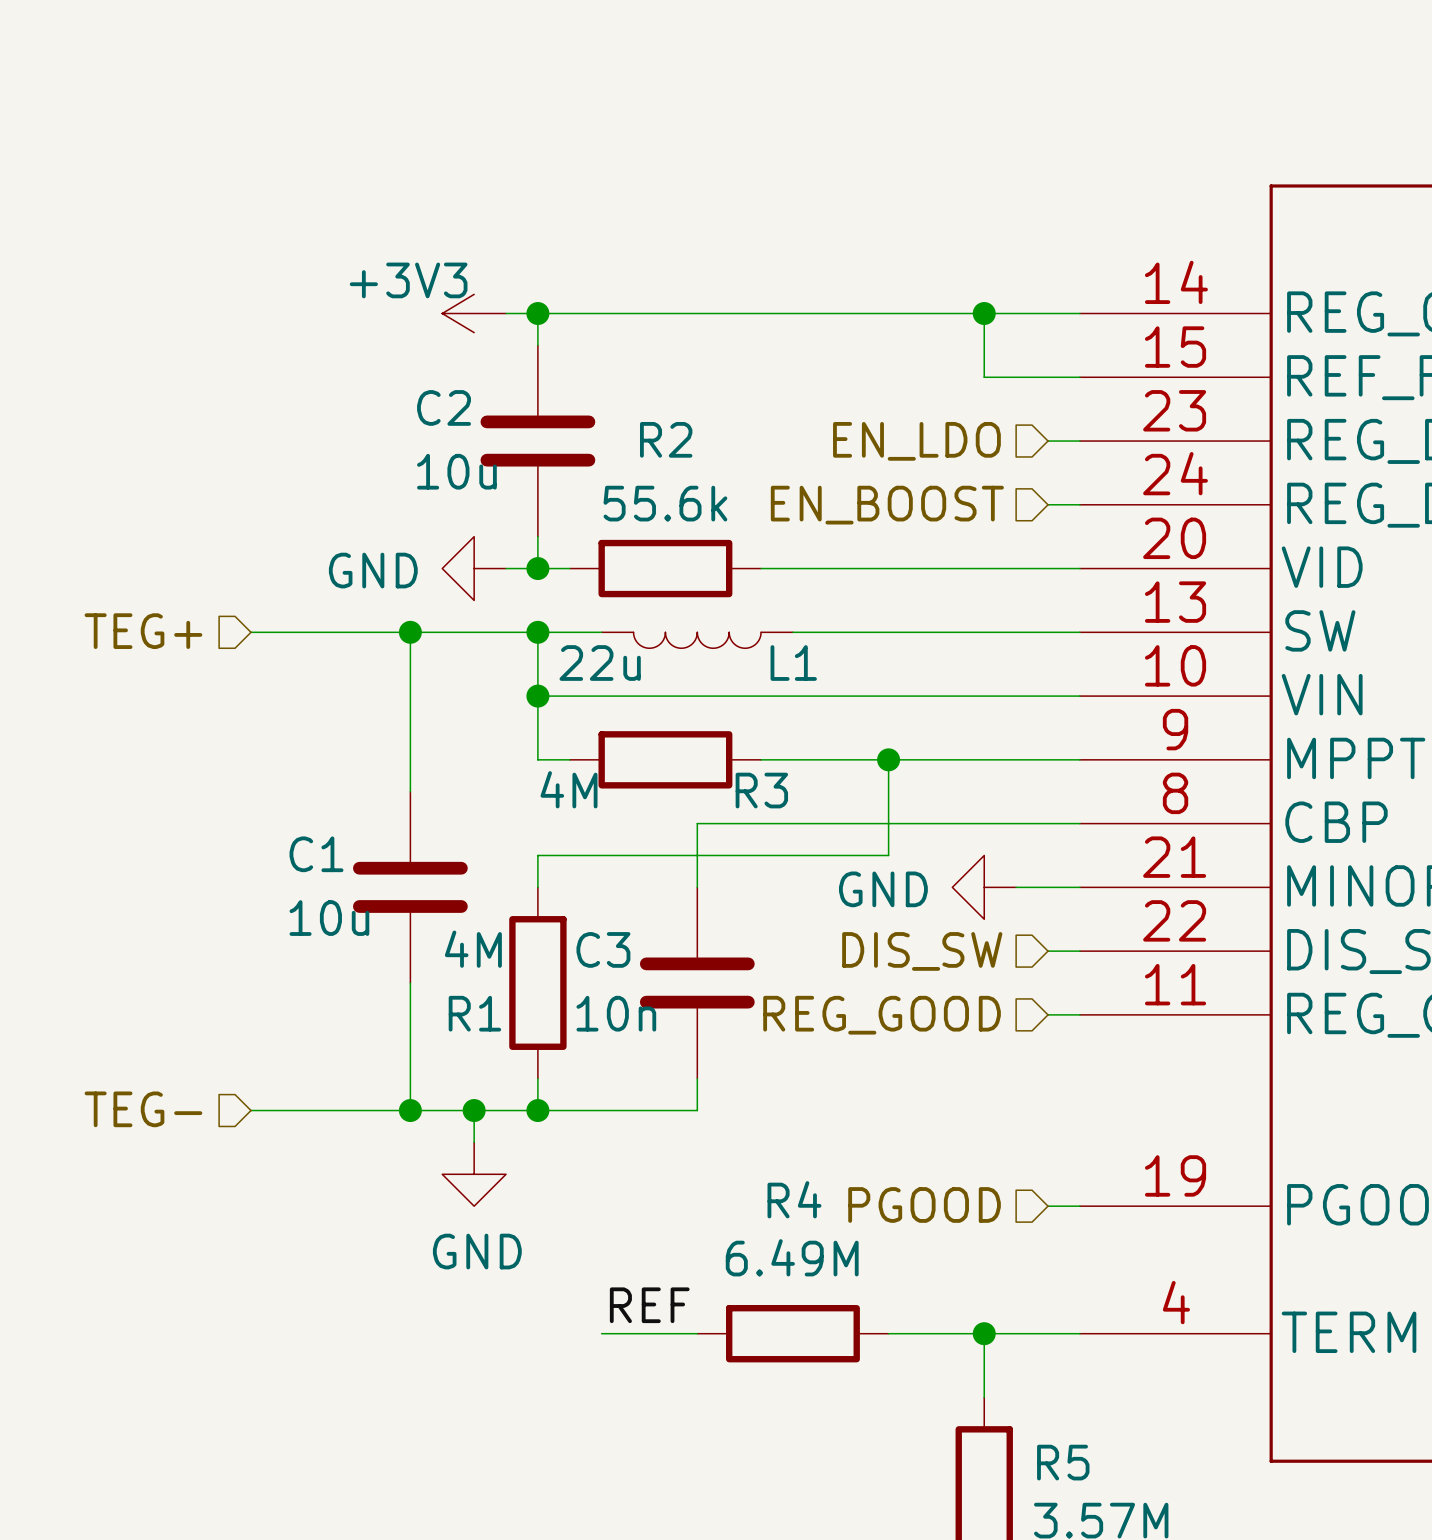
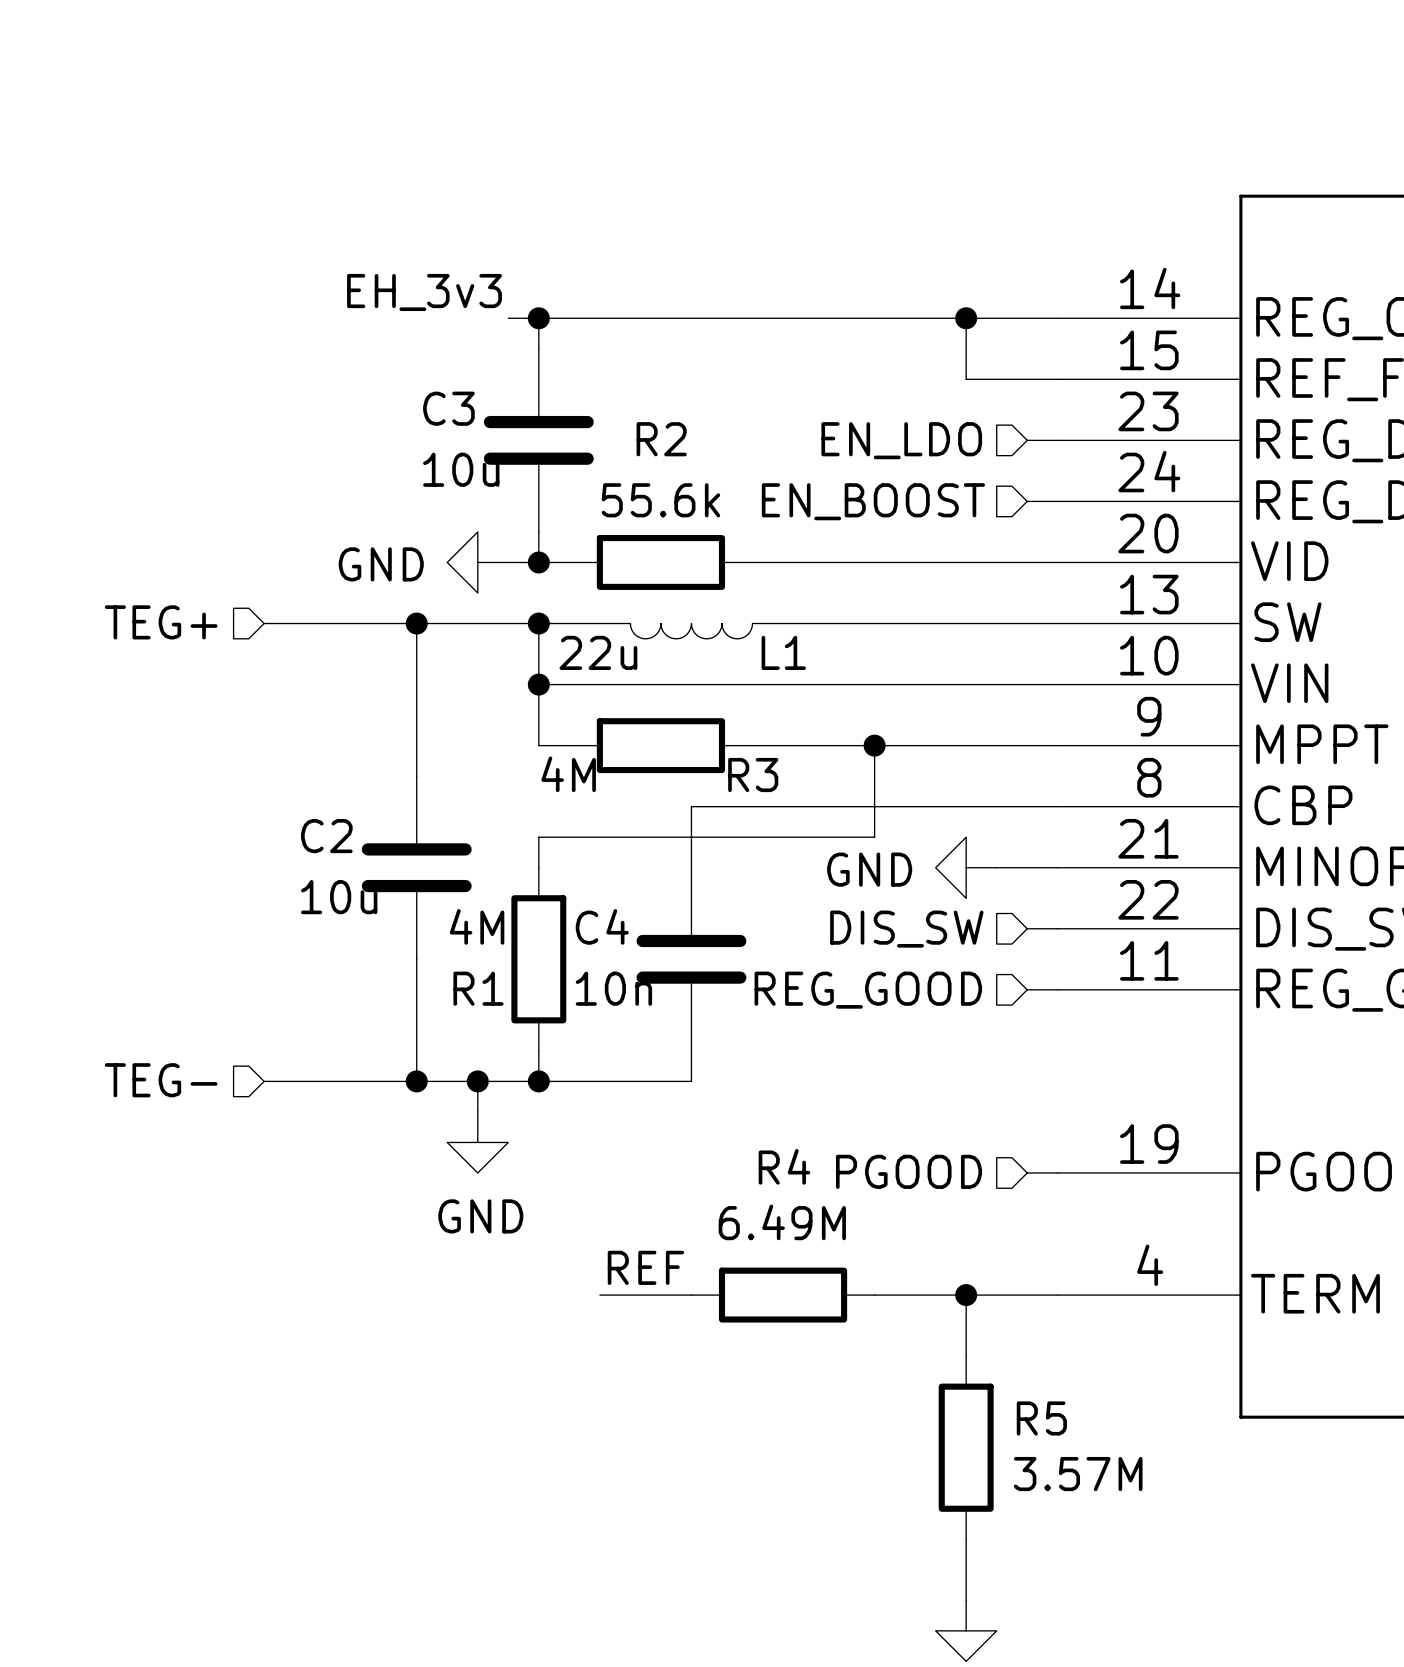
label: none -> EH_3v3 (424, 292)
power symbol: +3V3 (474, 313) -> none
C2 name: C2 (444, 407) -> C3 (448, 408)
C1 name: C1 (316, 854) -> C2 (326, 836)
C3 name: C3 (603, 949) -> C4 (602, 926)

